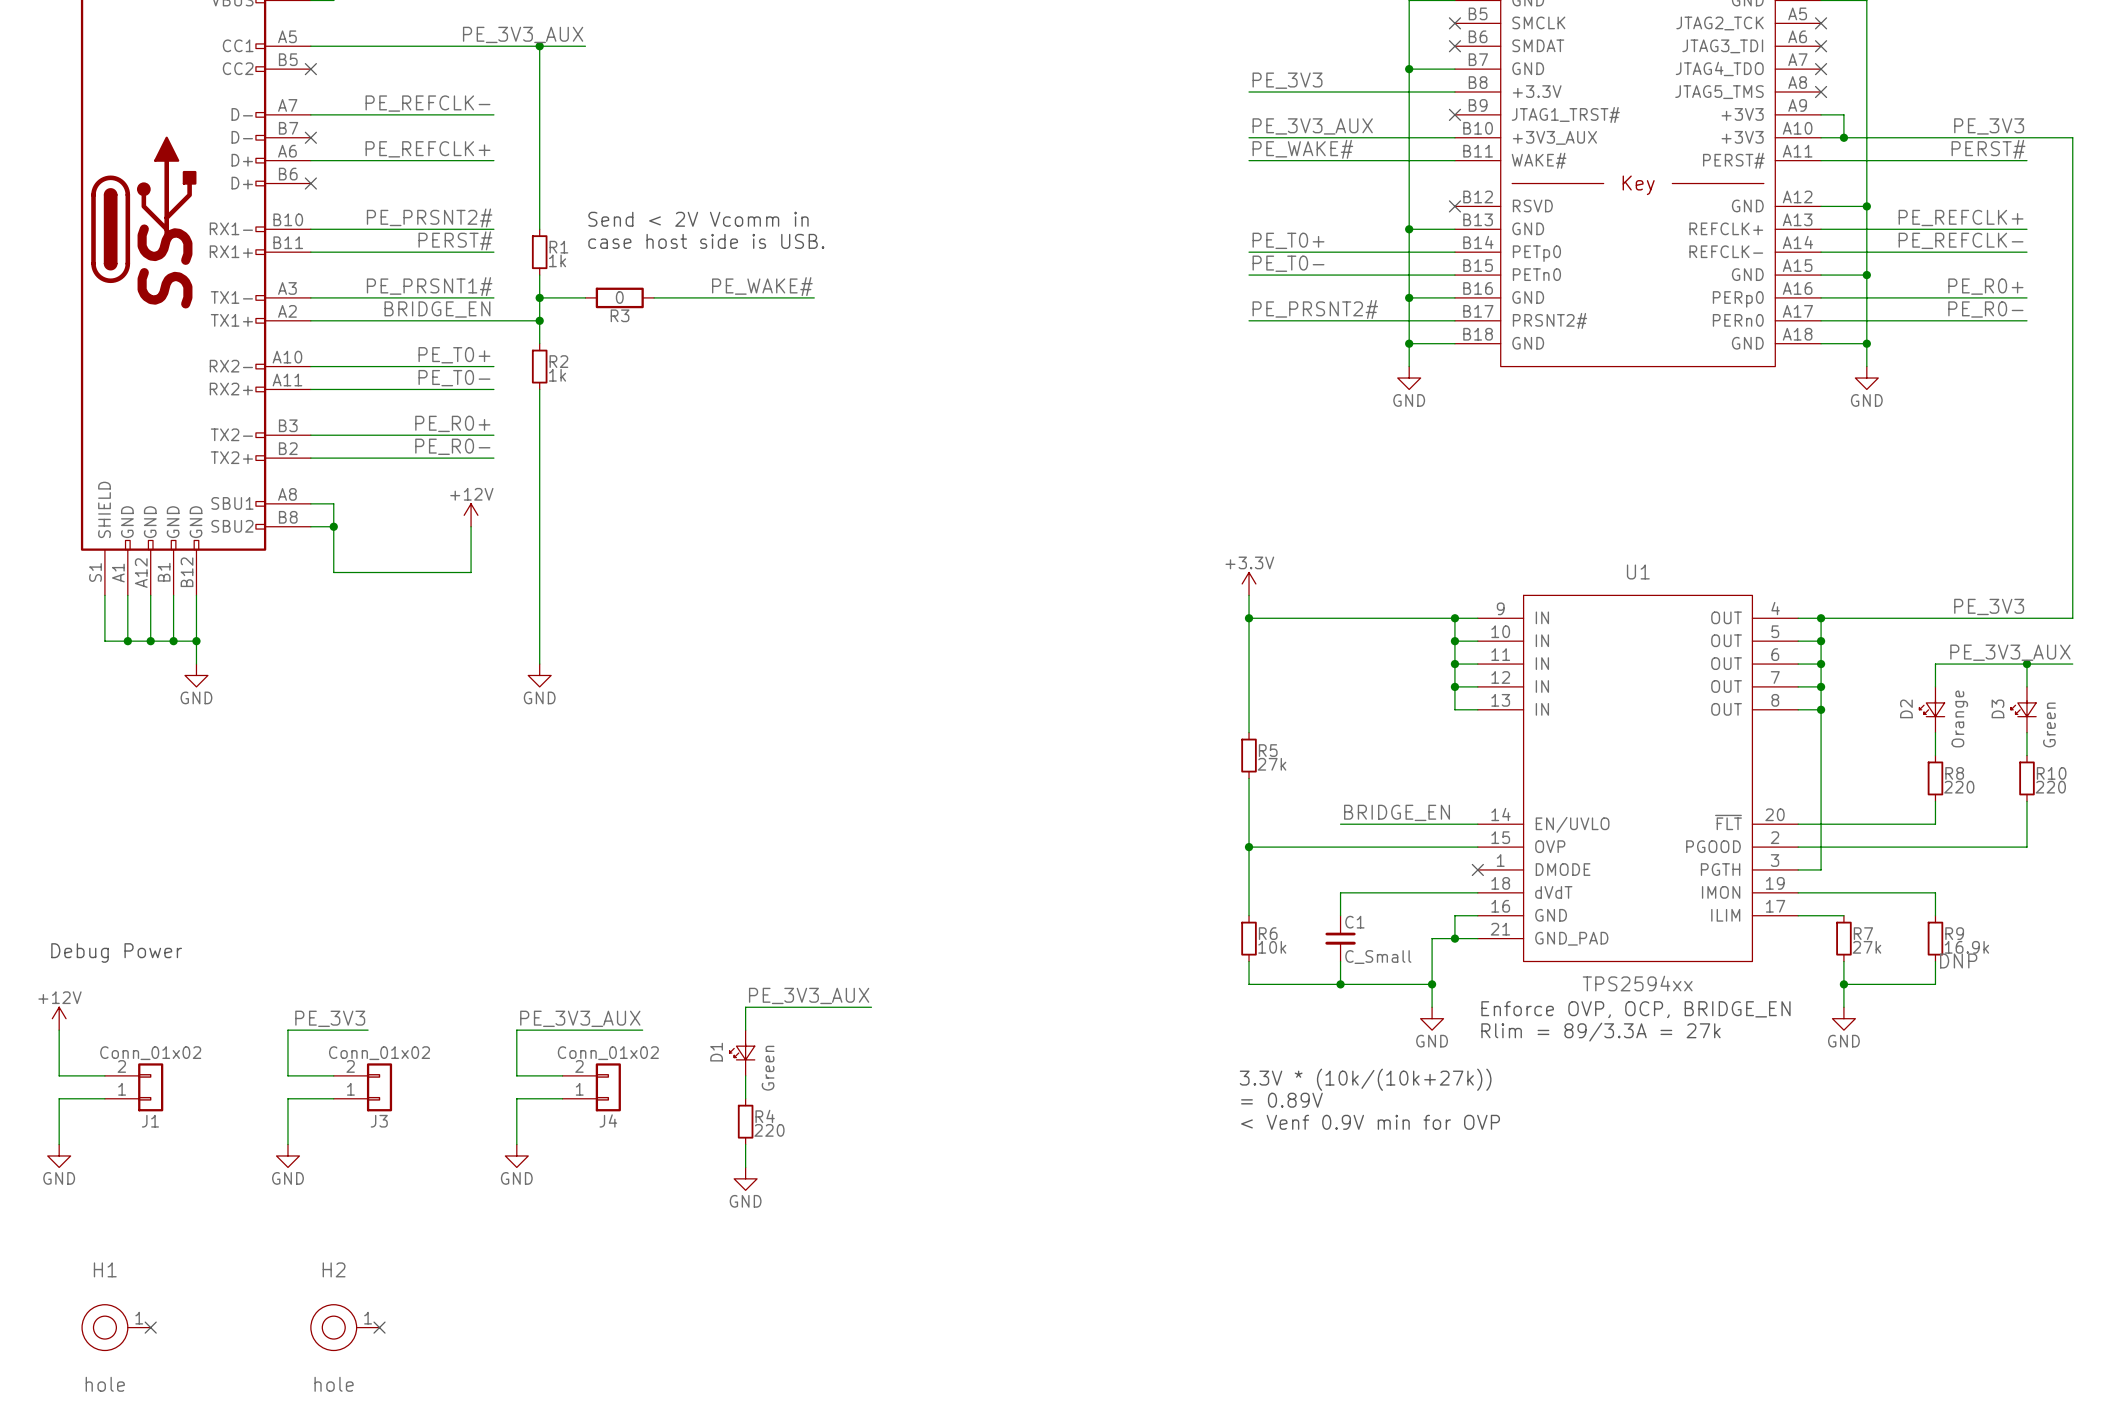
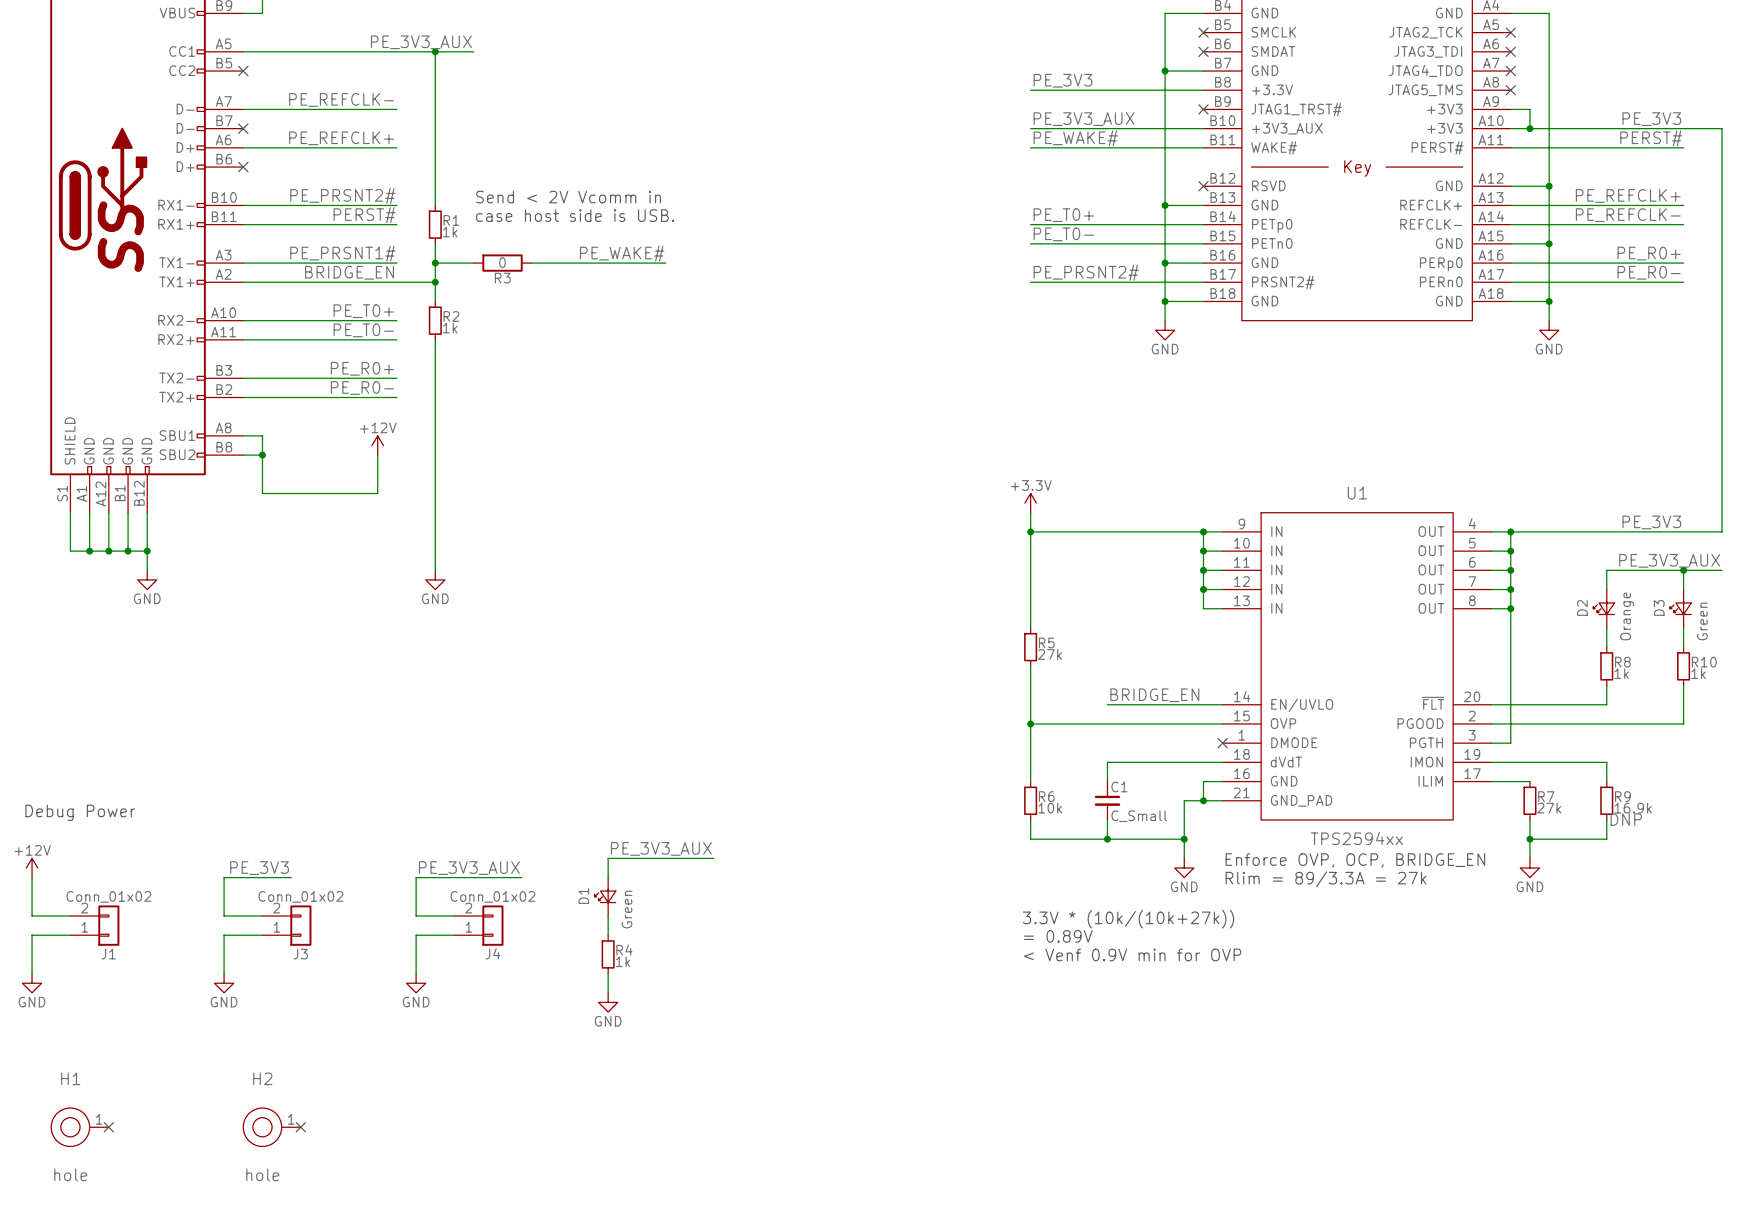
R8 value: 220 (1959, 787) -> 1k (1621, 673)
R10 value: 220 (2050, 787) -> 1k (1698, 673)
R4 value: 220 (769, 1130) -> 1k (623, 961)

